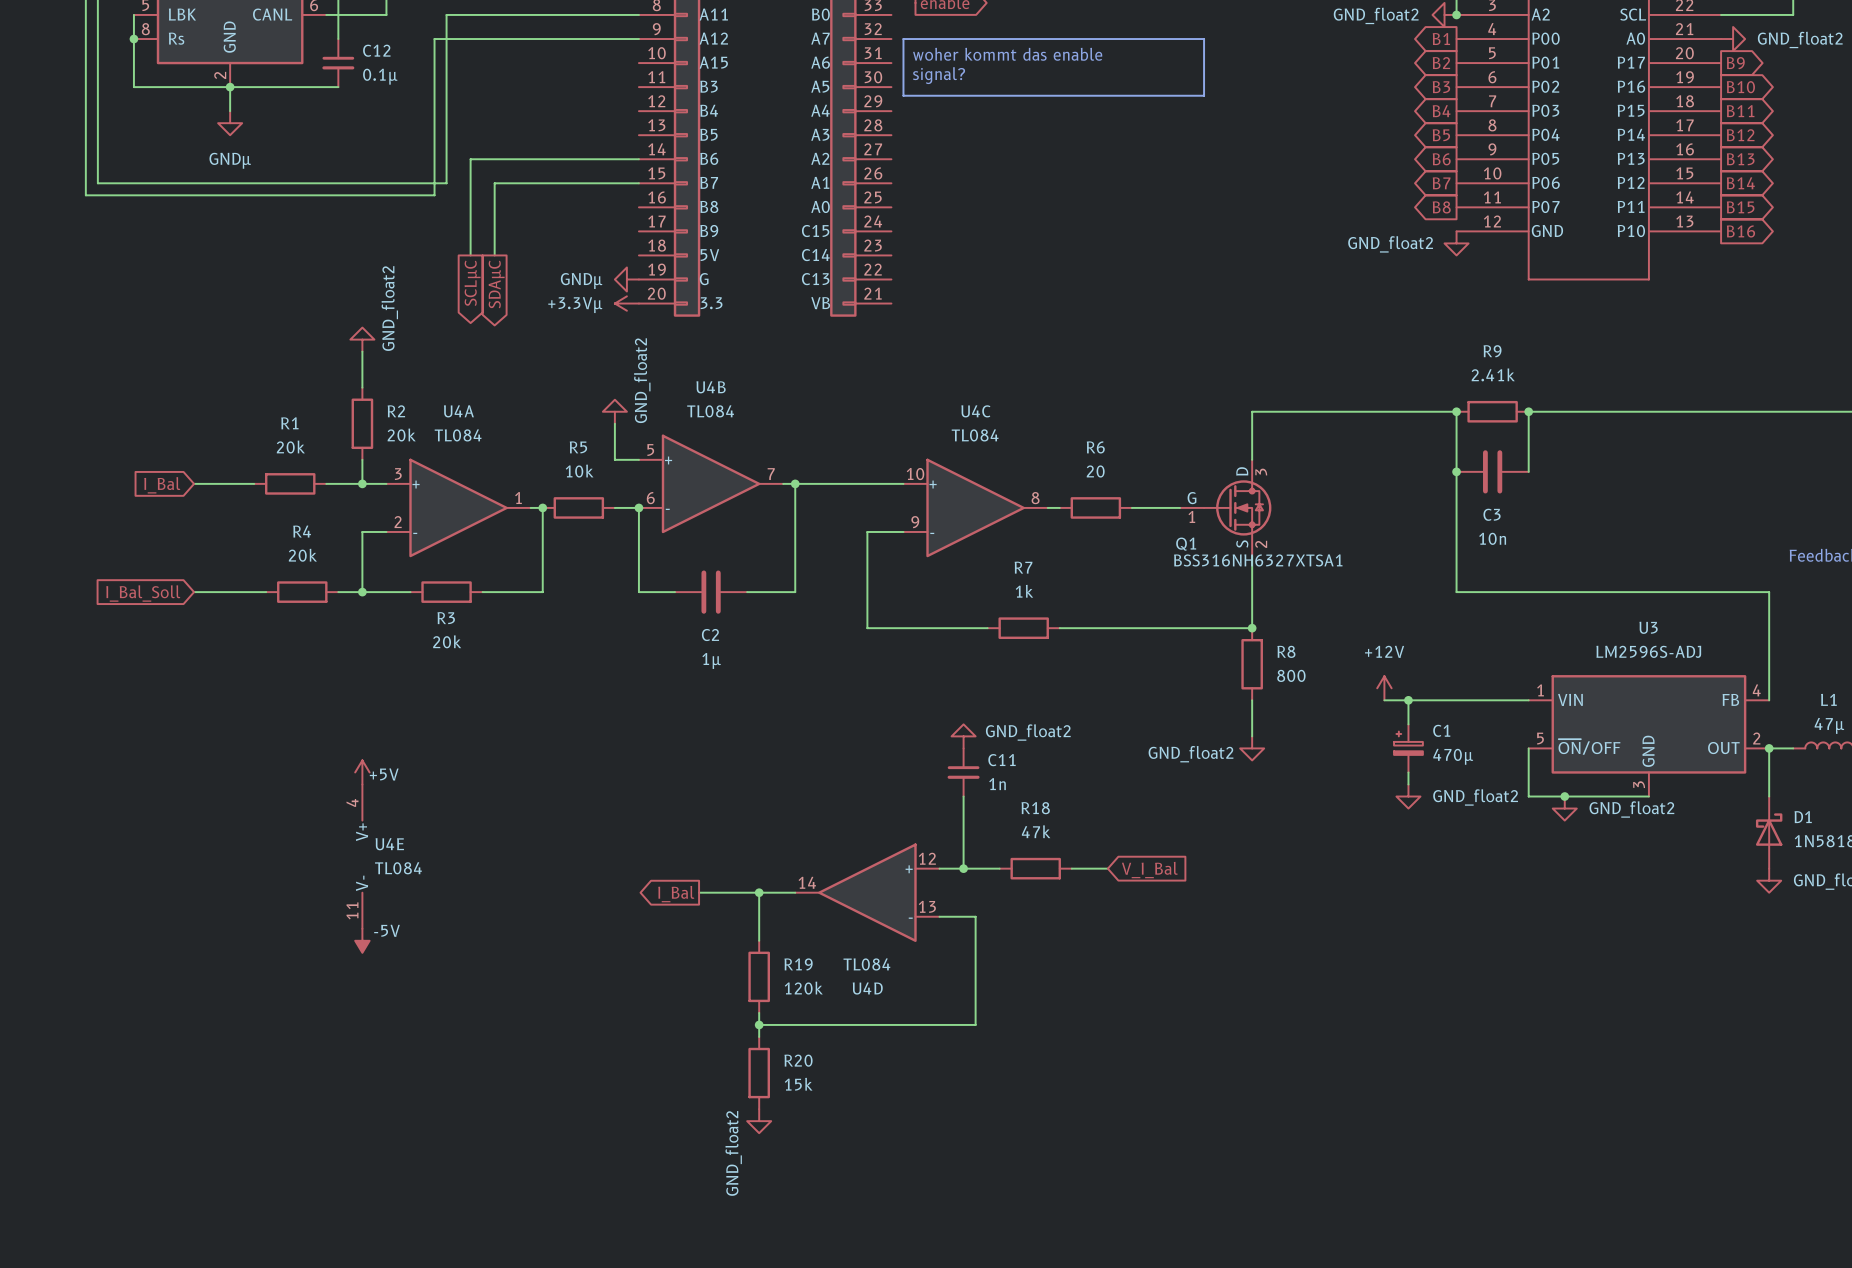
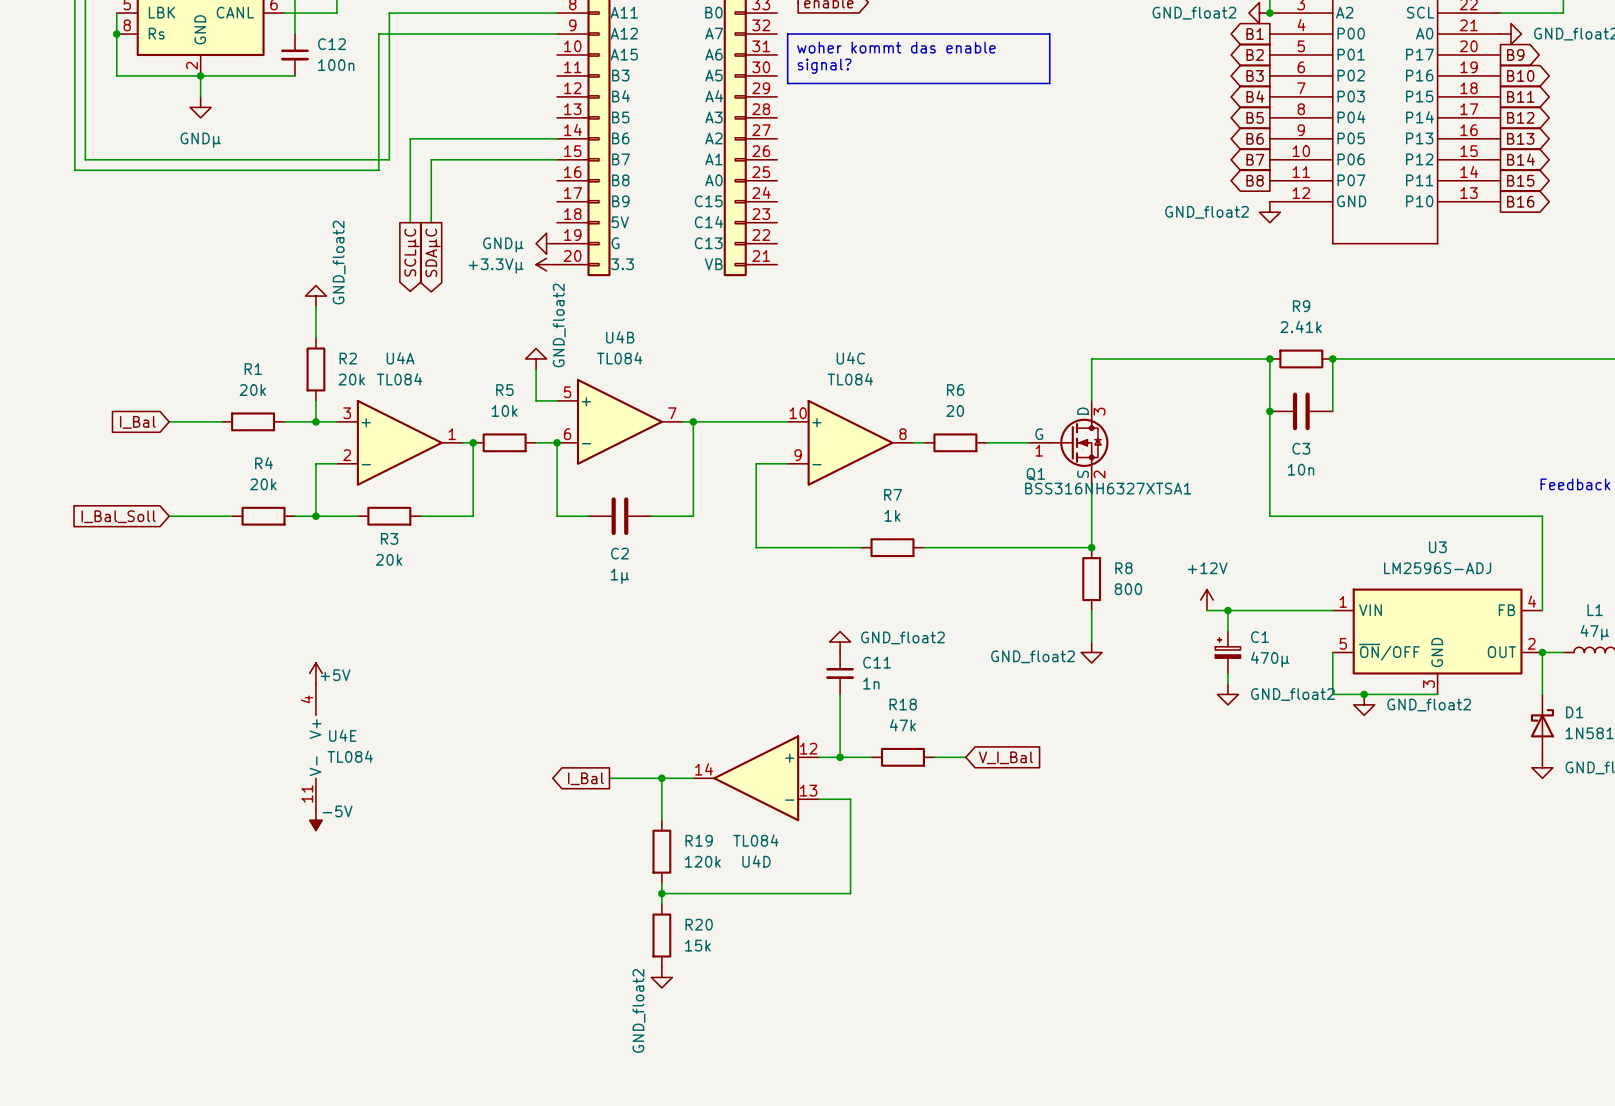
C12 value: 0.1µ (380, 76) -> 100n (336, 65)

